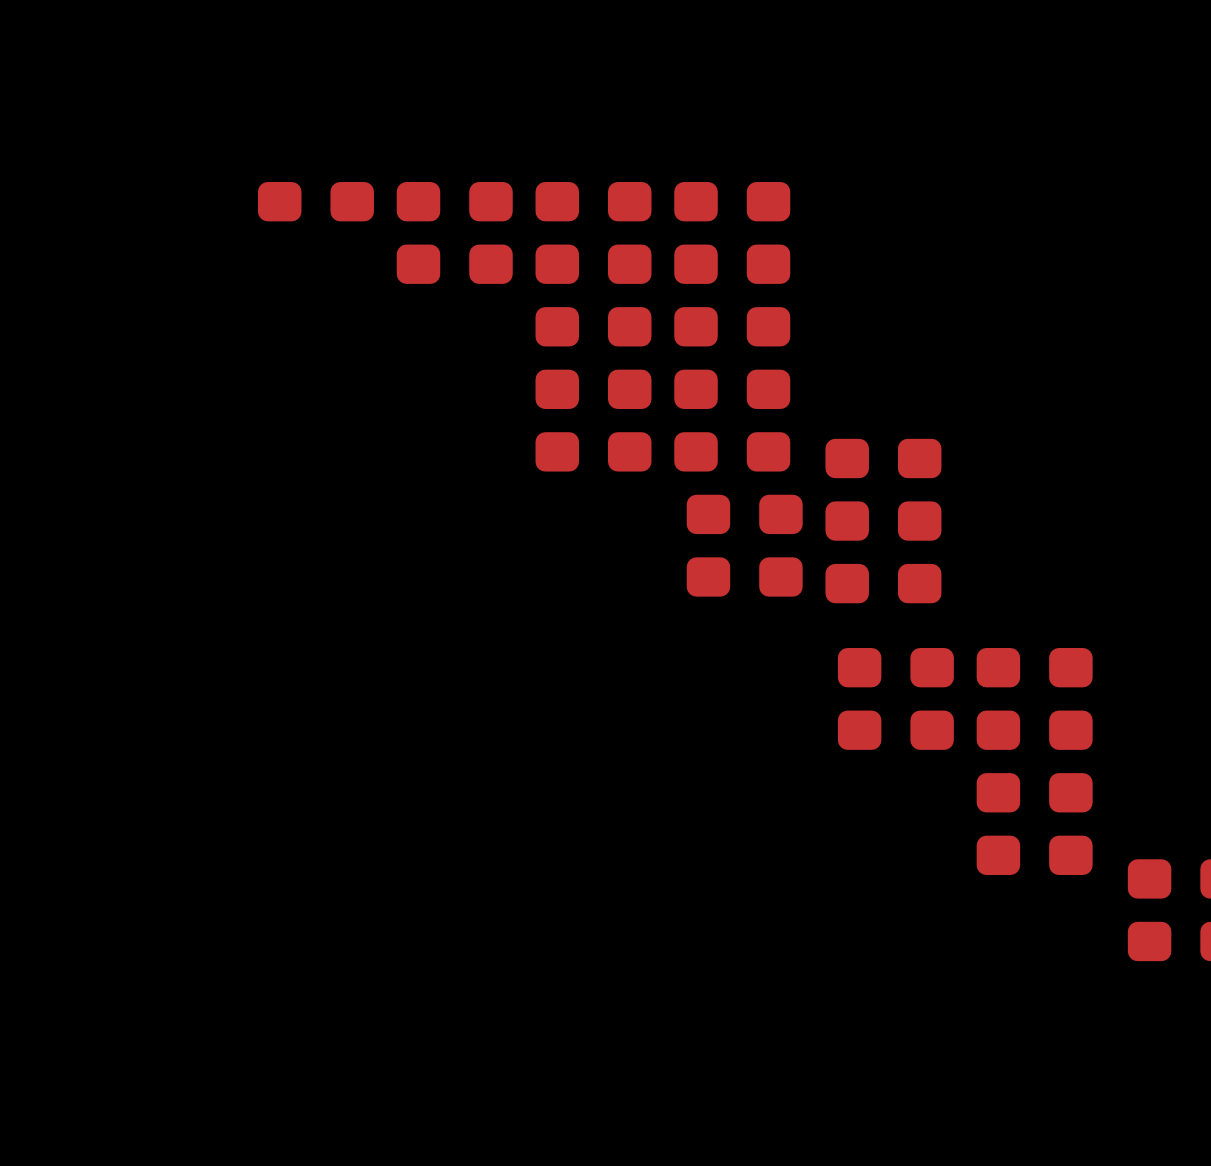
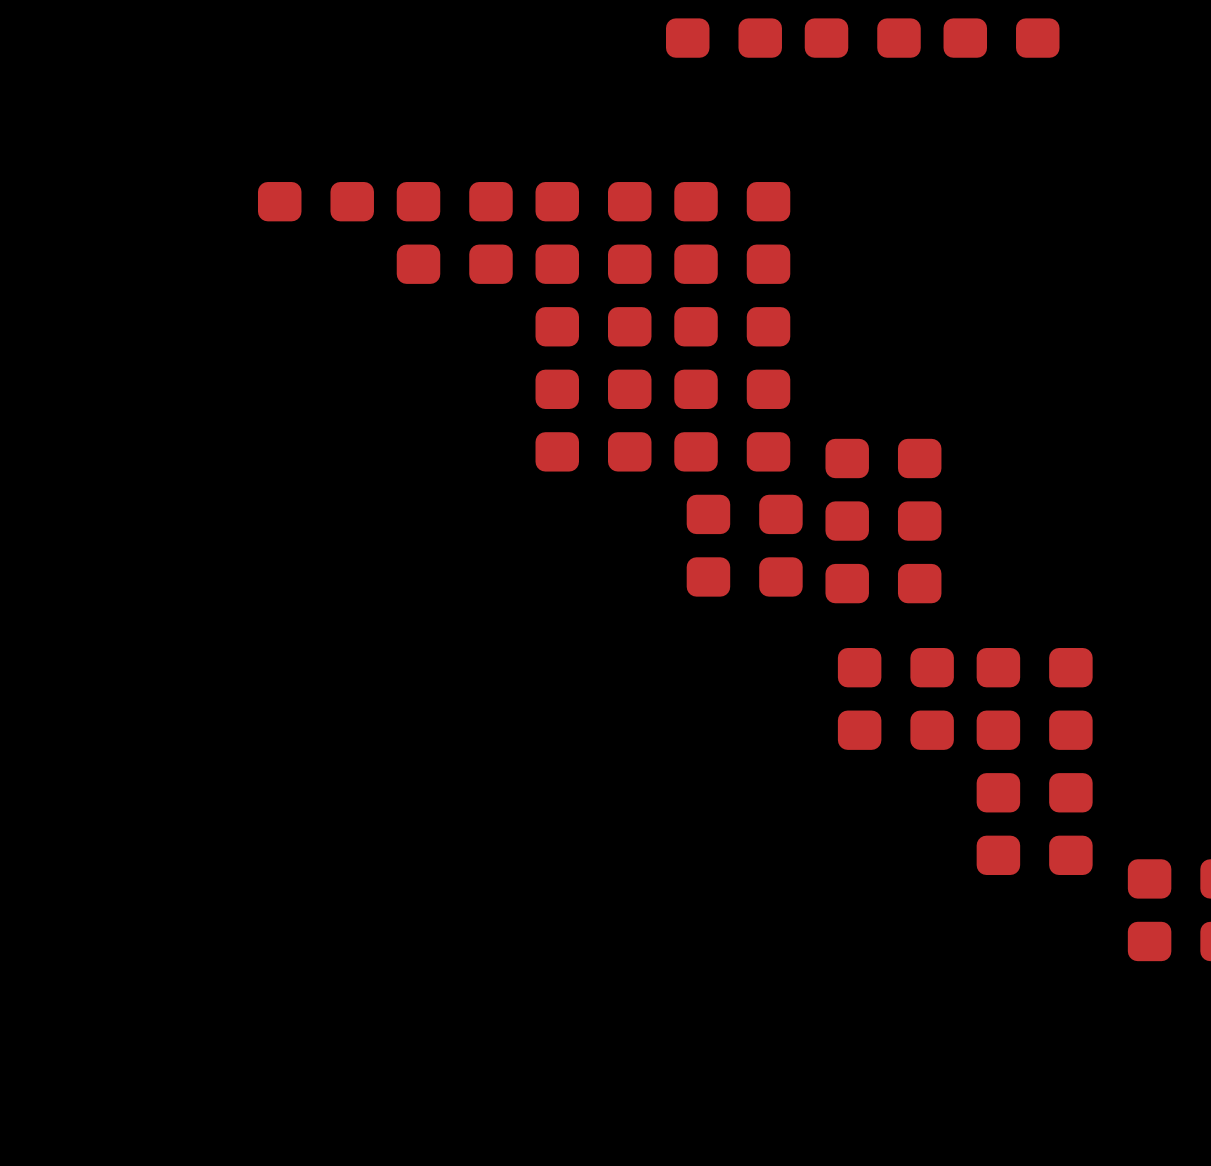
part: none -> (723, 38)
part: none -> (862, 38)
part: none -> (1001, 38)

